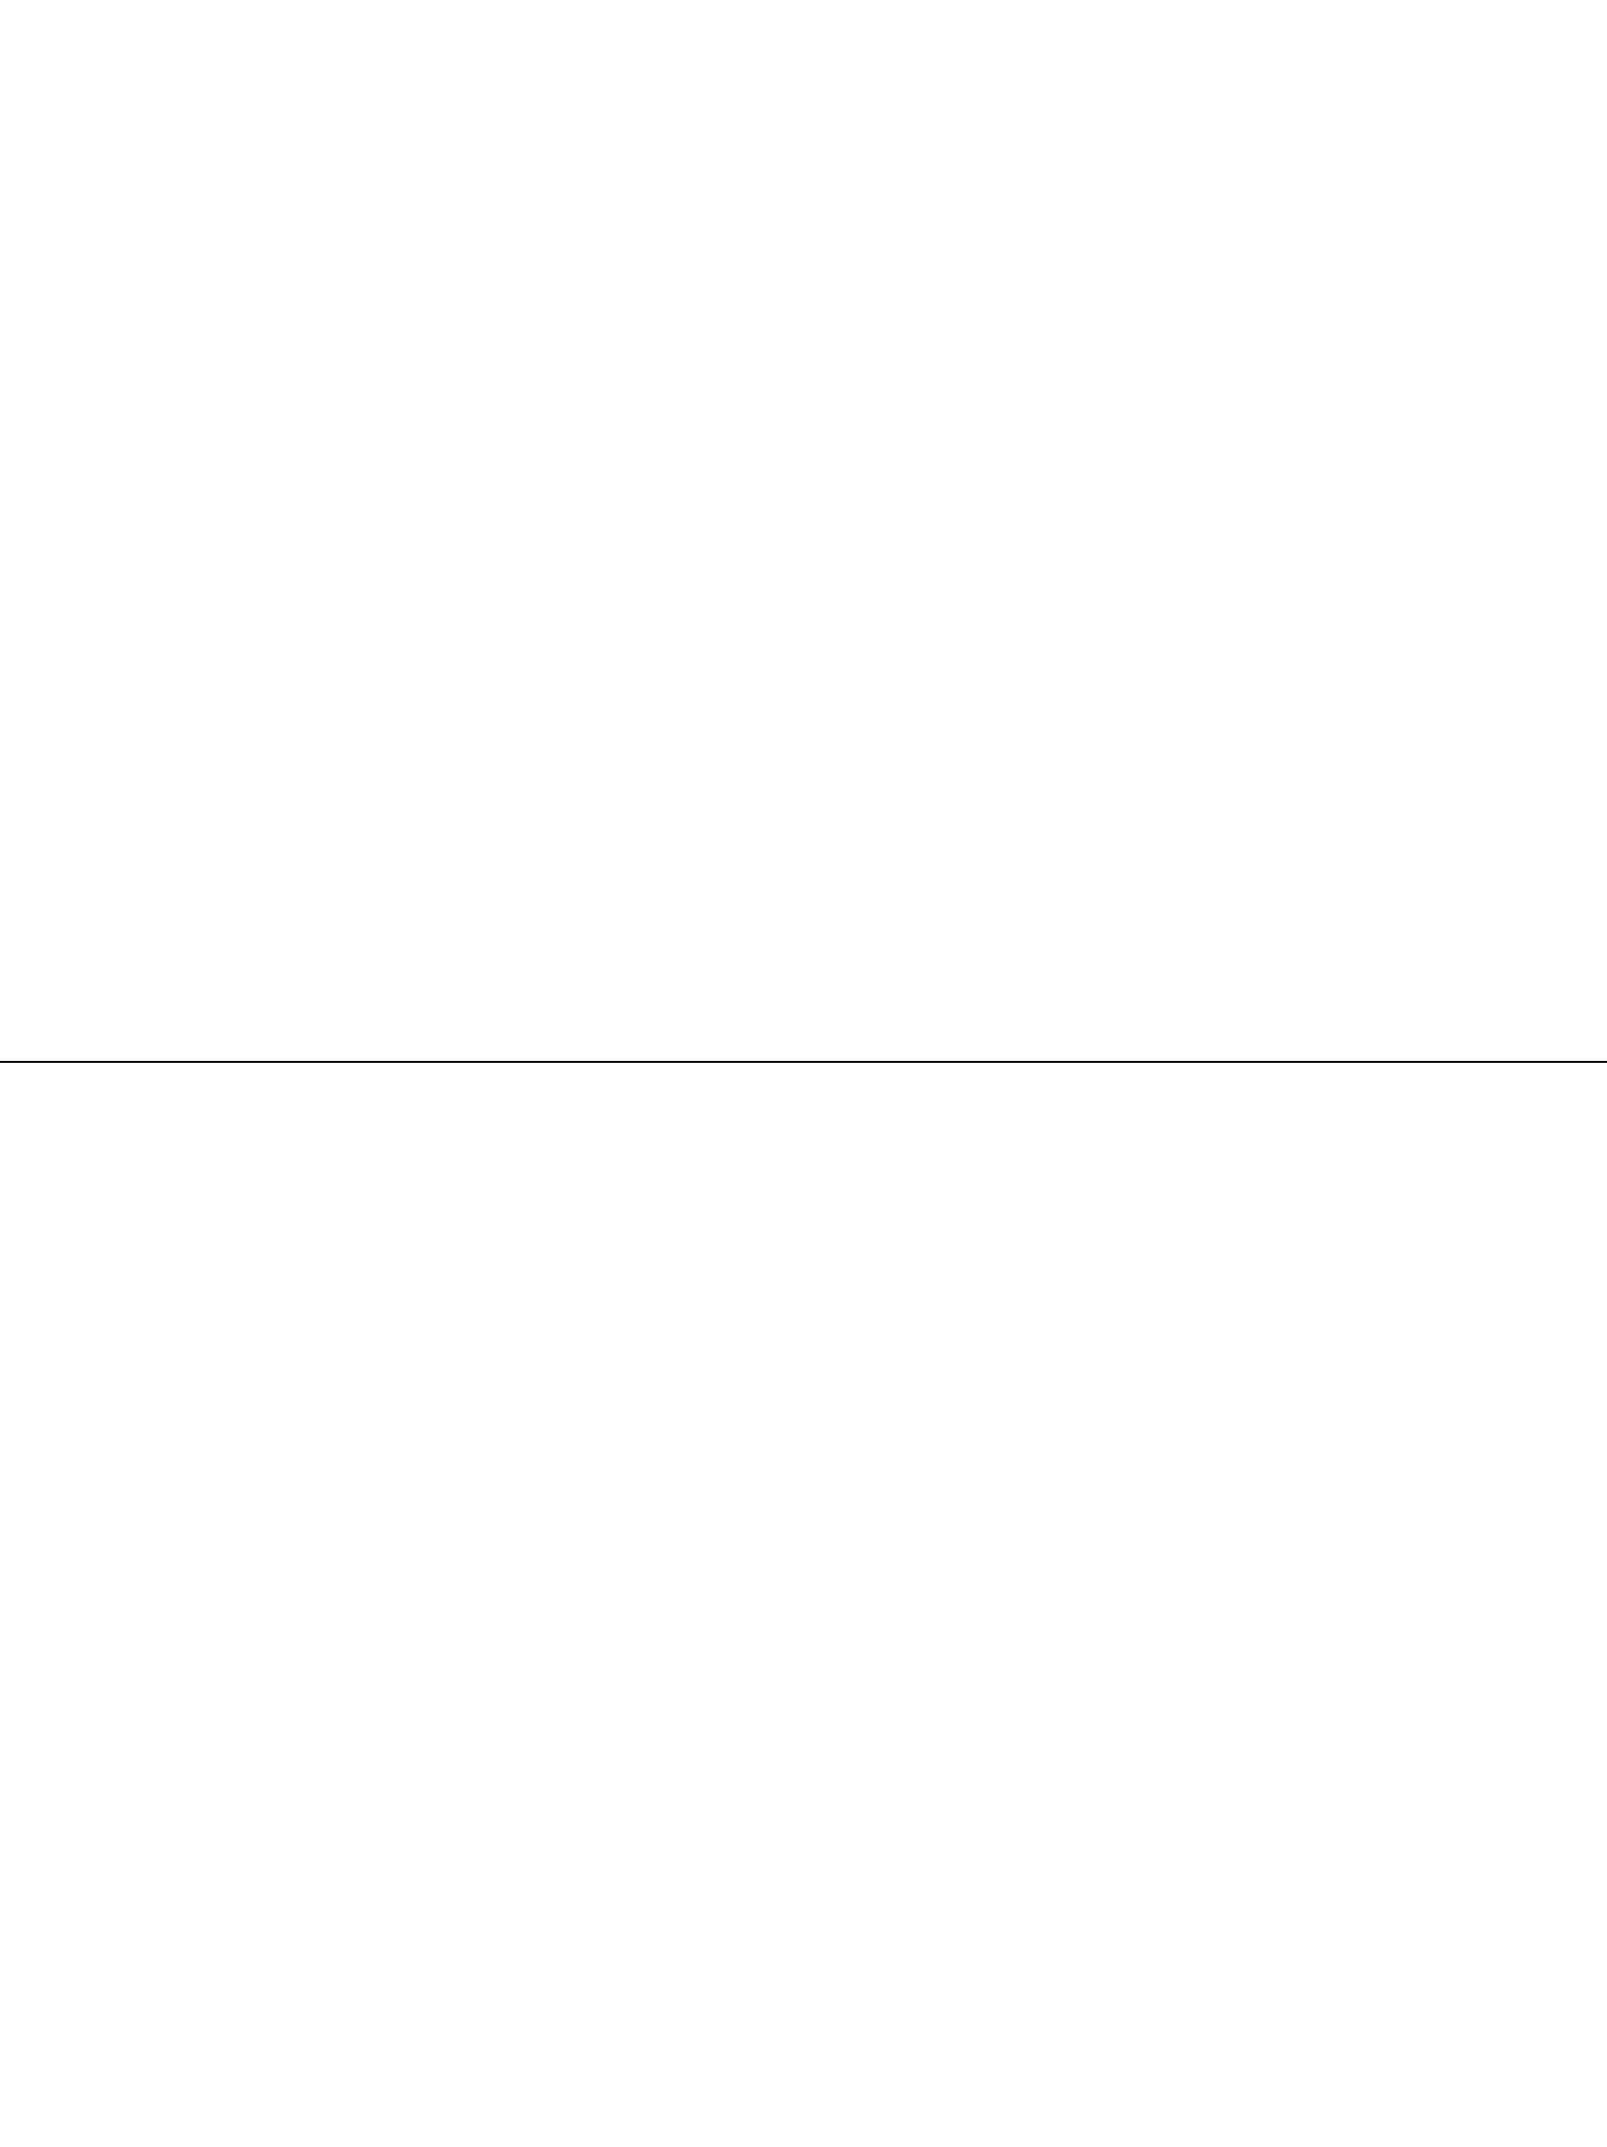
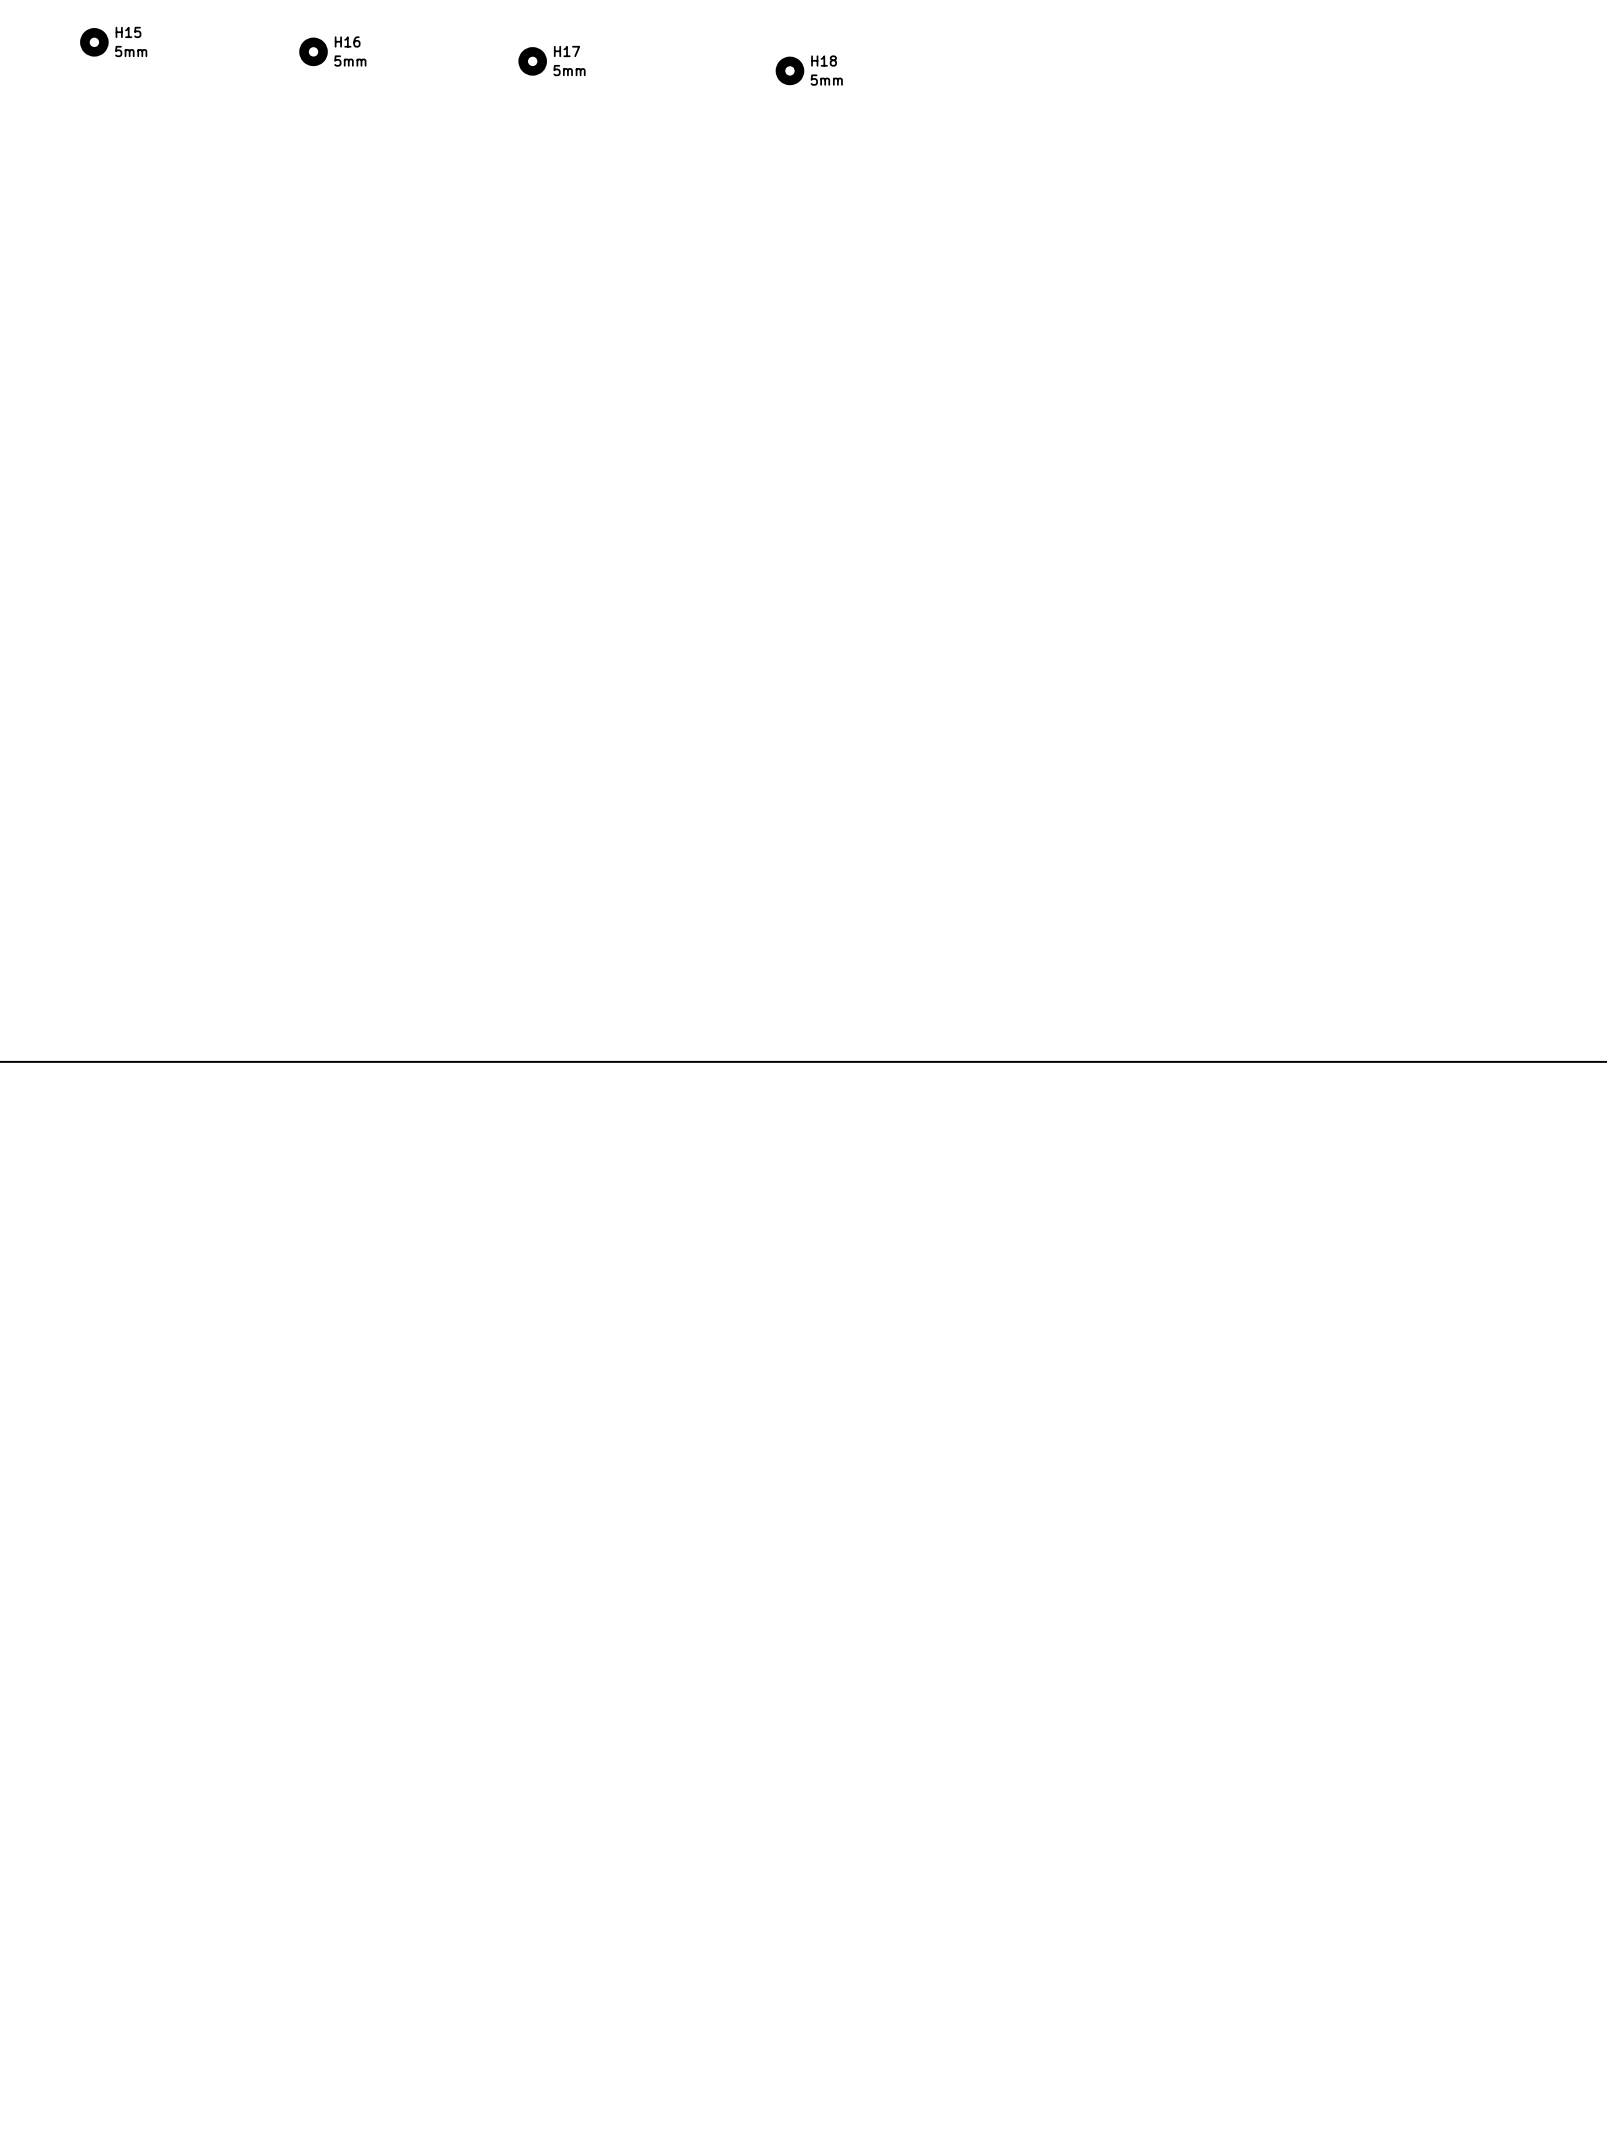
H15: none -> 5mm (94, 42)
H16: none -> 5mm (313, 51)
H17: none -> 5mm (532, 61)
H18: none -> 5mm (789, 70)

